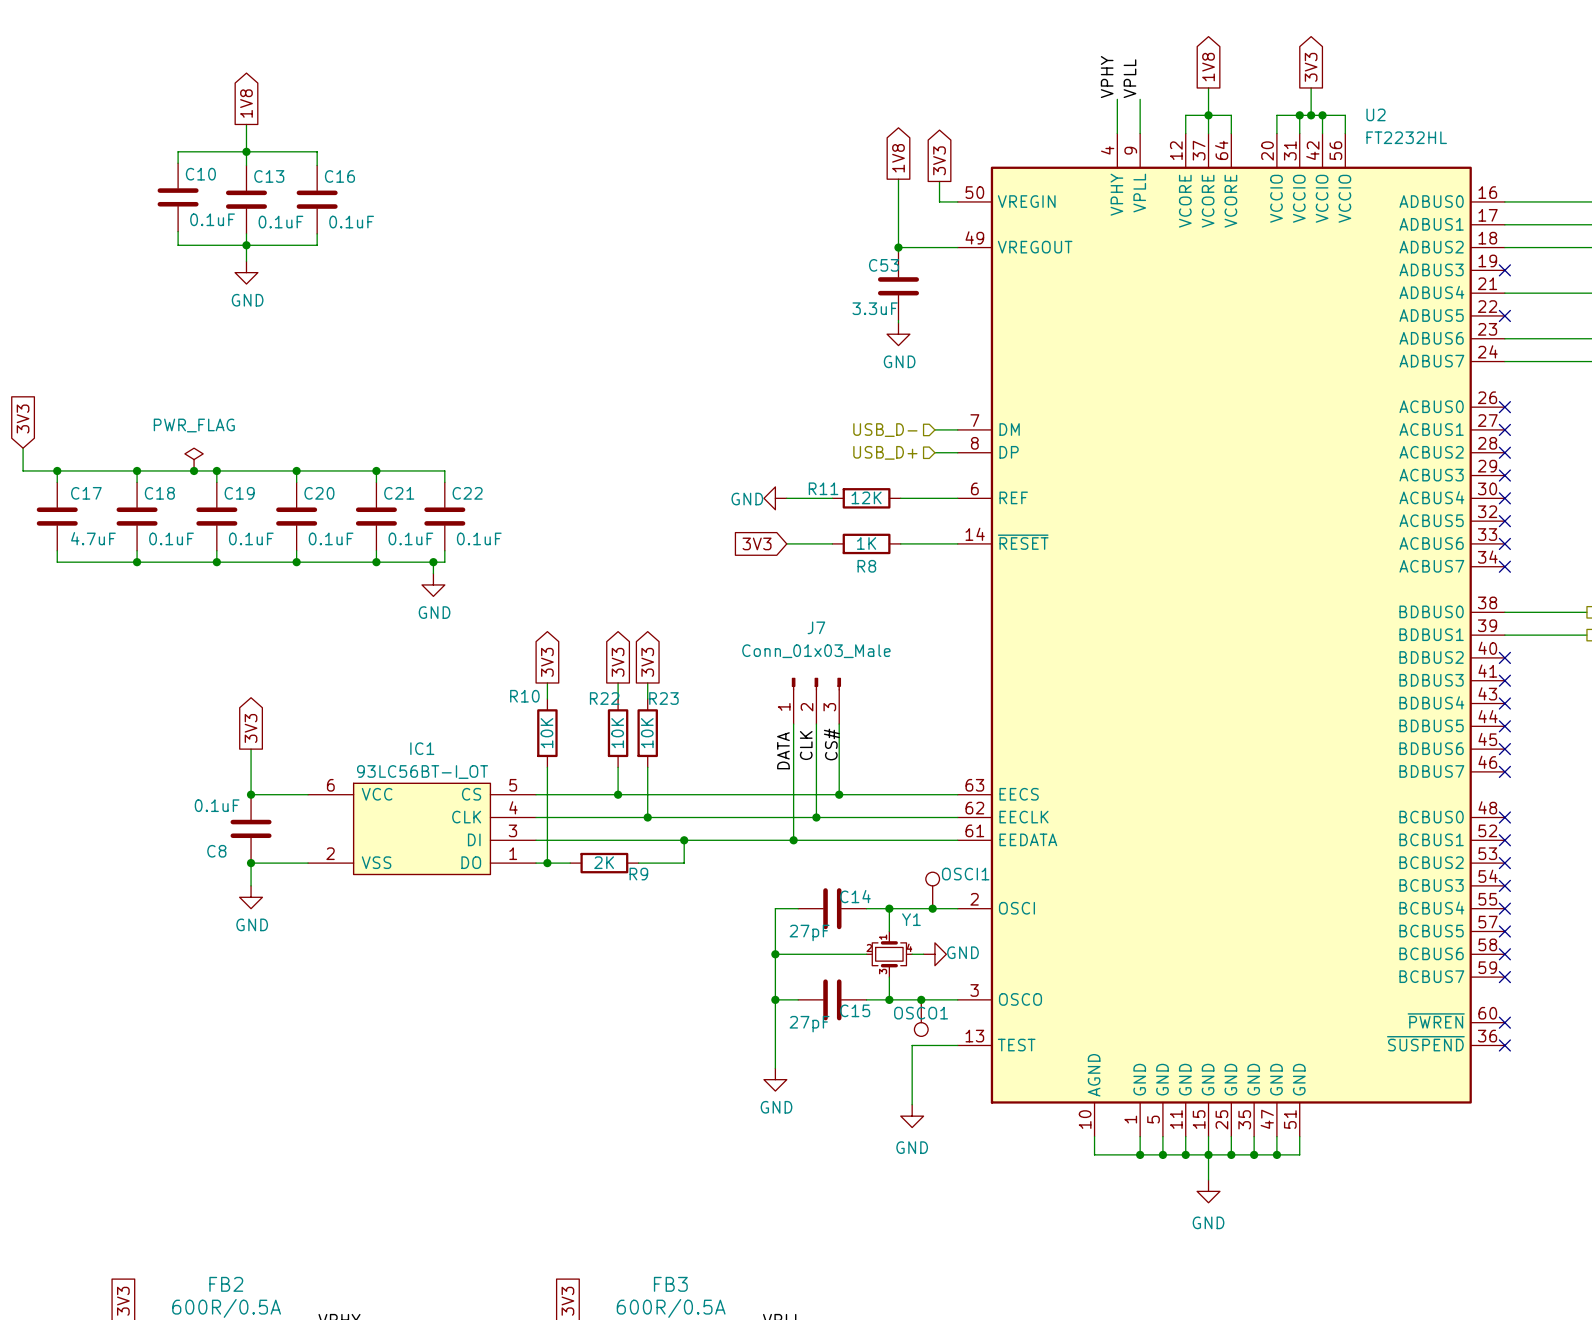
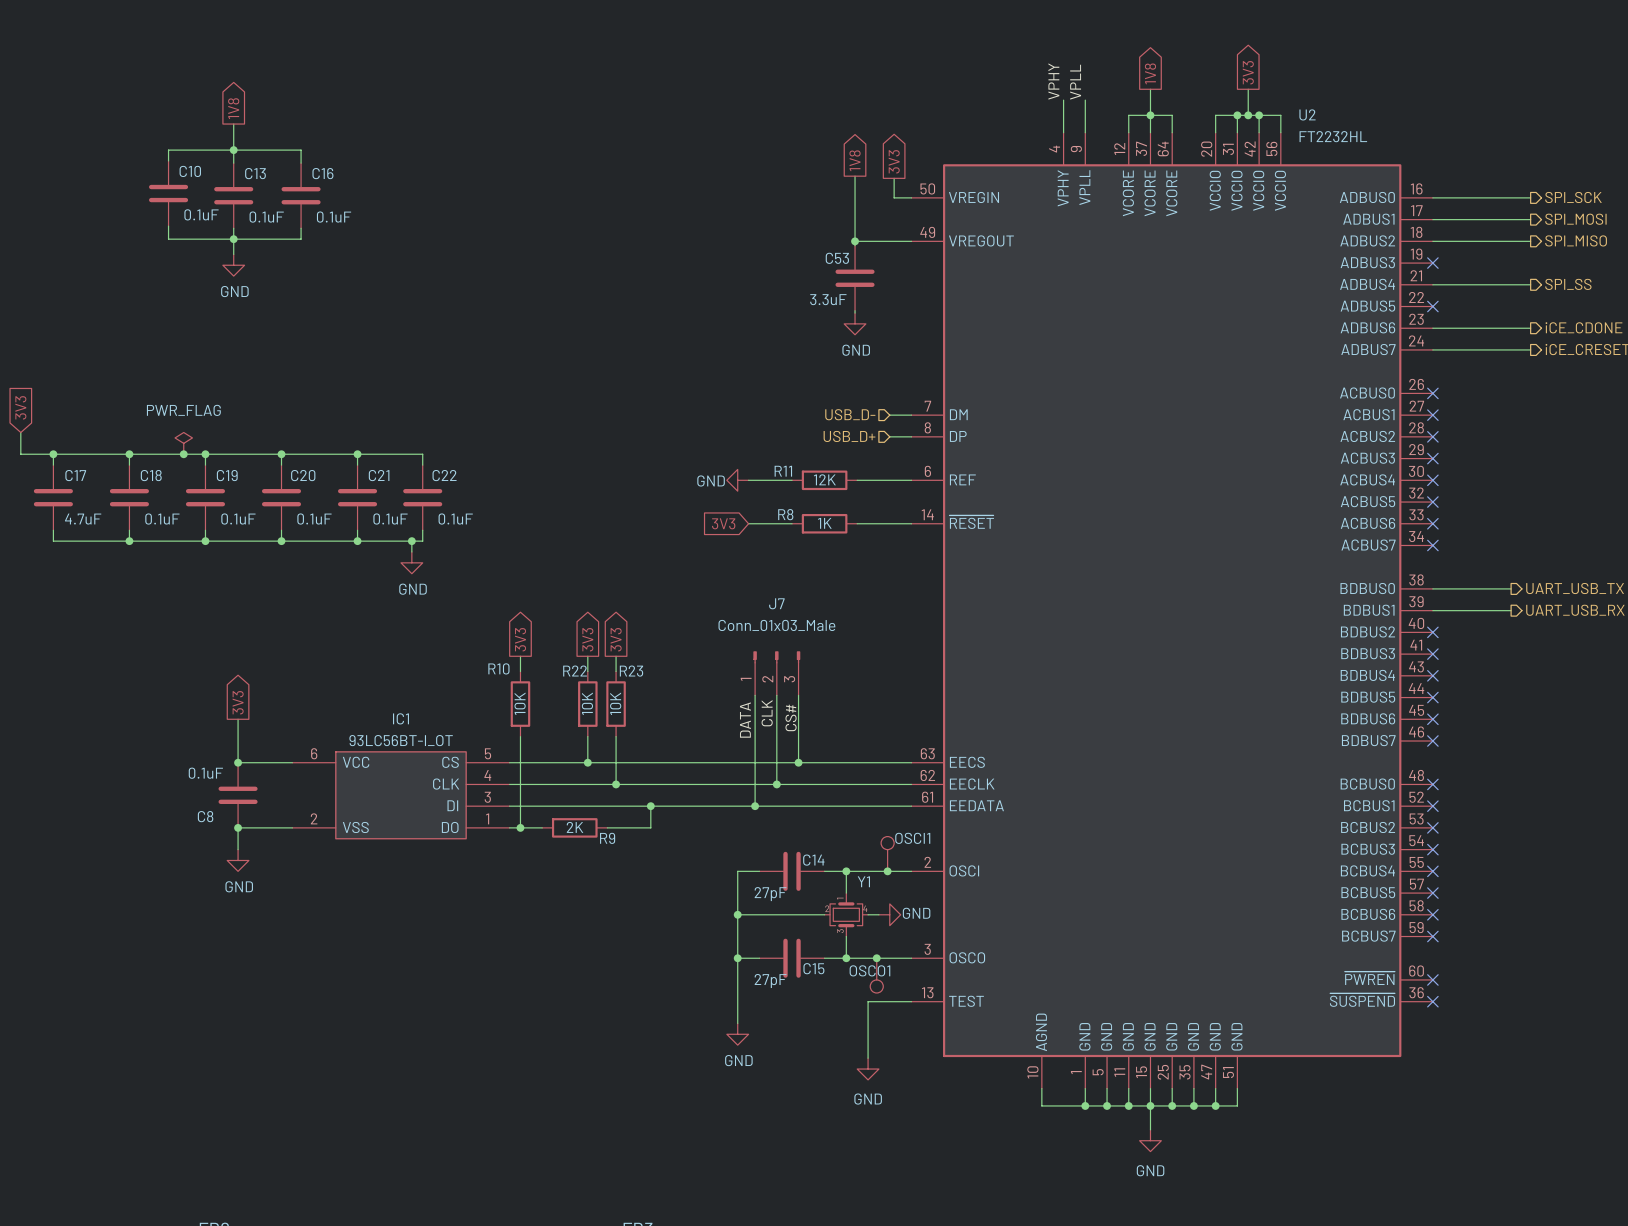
R8 name position: R8 (866, 566) -> R8 (785, 514)

